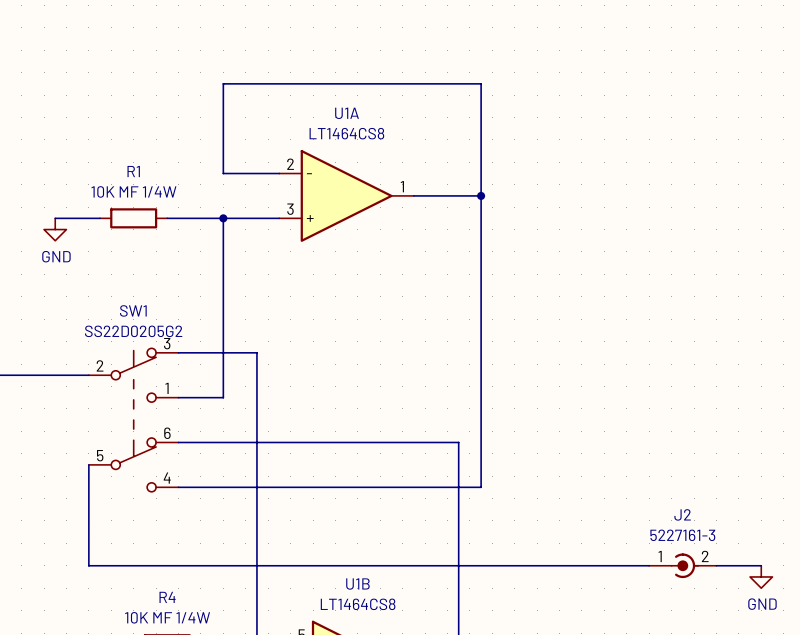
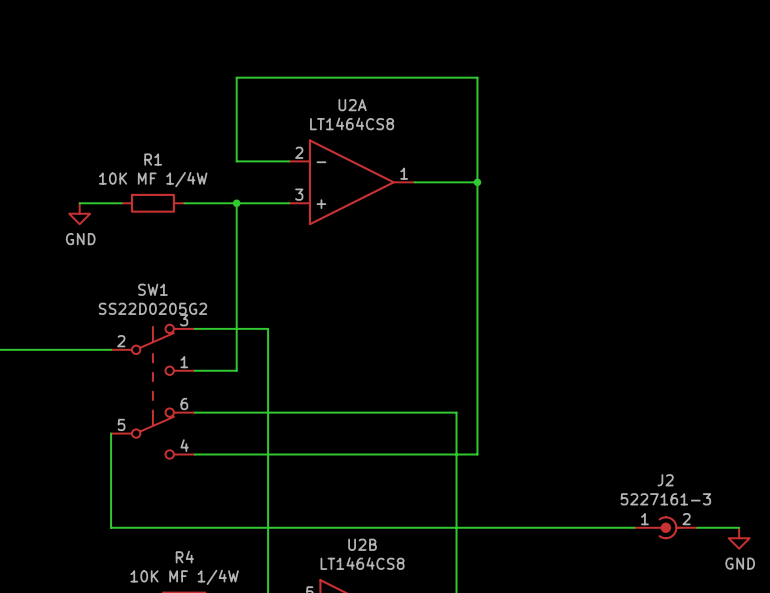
U1A name: U1A (347, 113) -> U2A (352, 105)
U1B name: U1B (357, 584) -> U2B (362, 544)

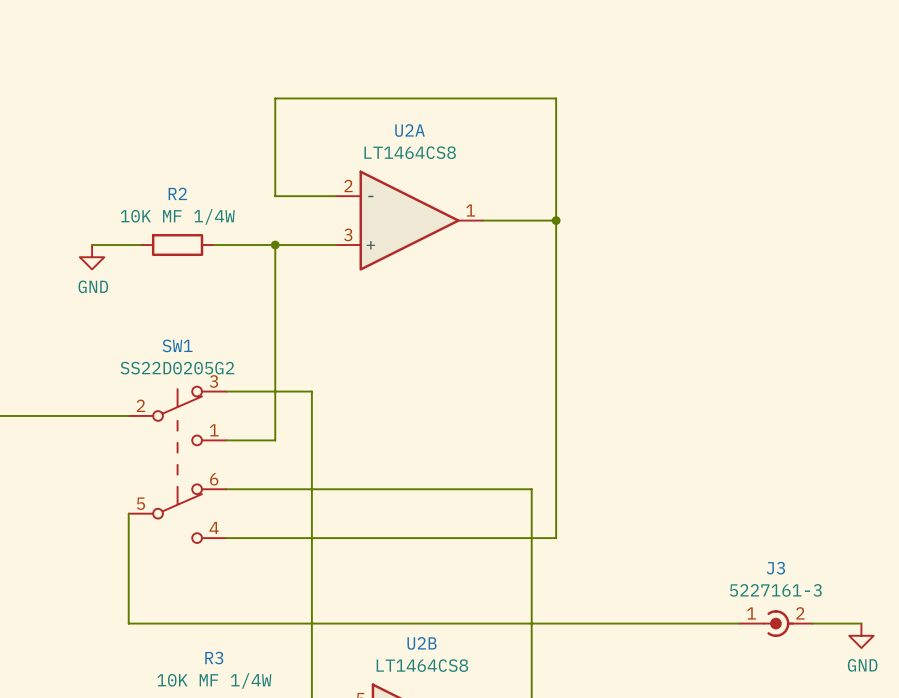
R1 name: R1 (153, 159) -> R2 (177, 193)
J2 name: J2 (665, 480) -> J3 (775, 568)
R4 name: R4 (184, 557) -> R3 (214, 658)

